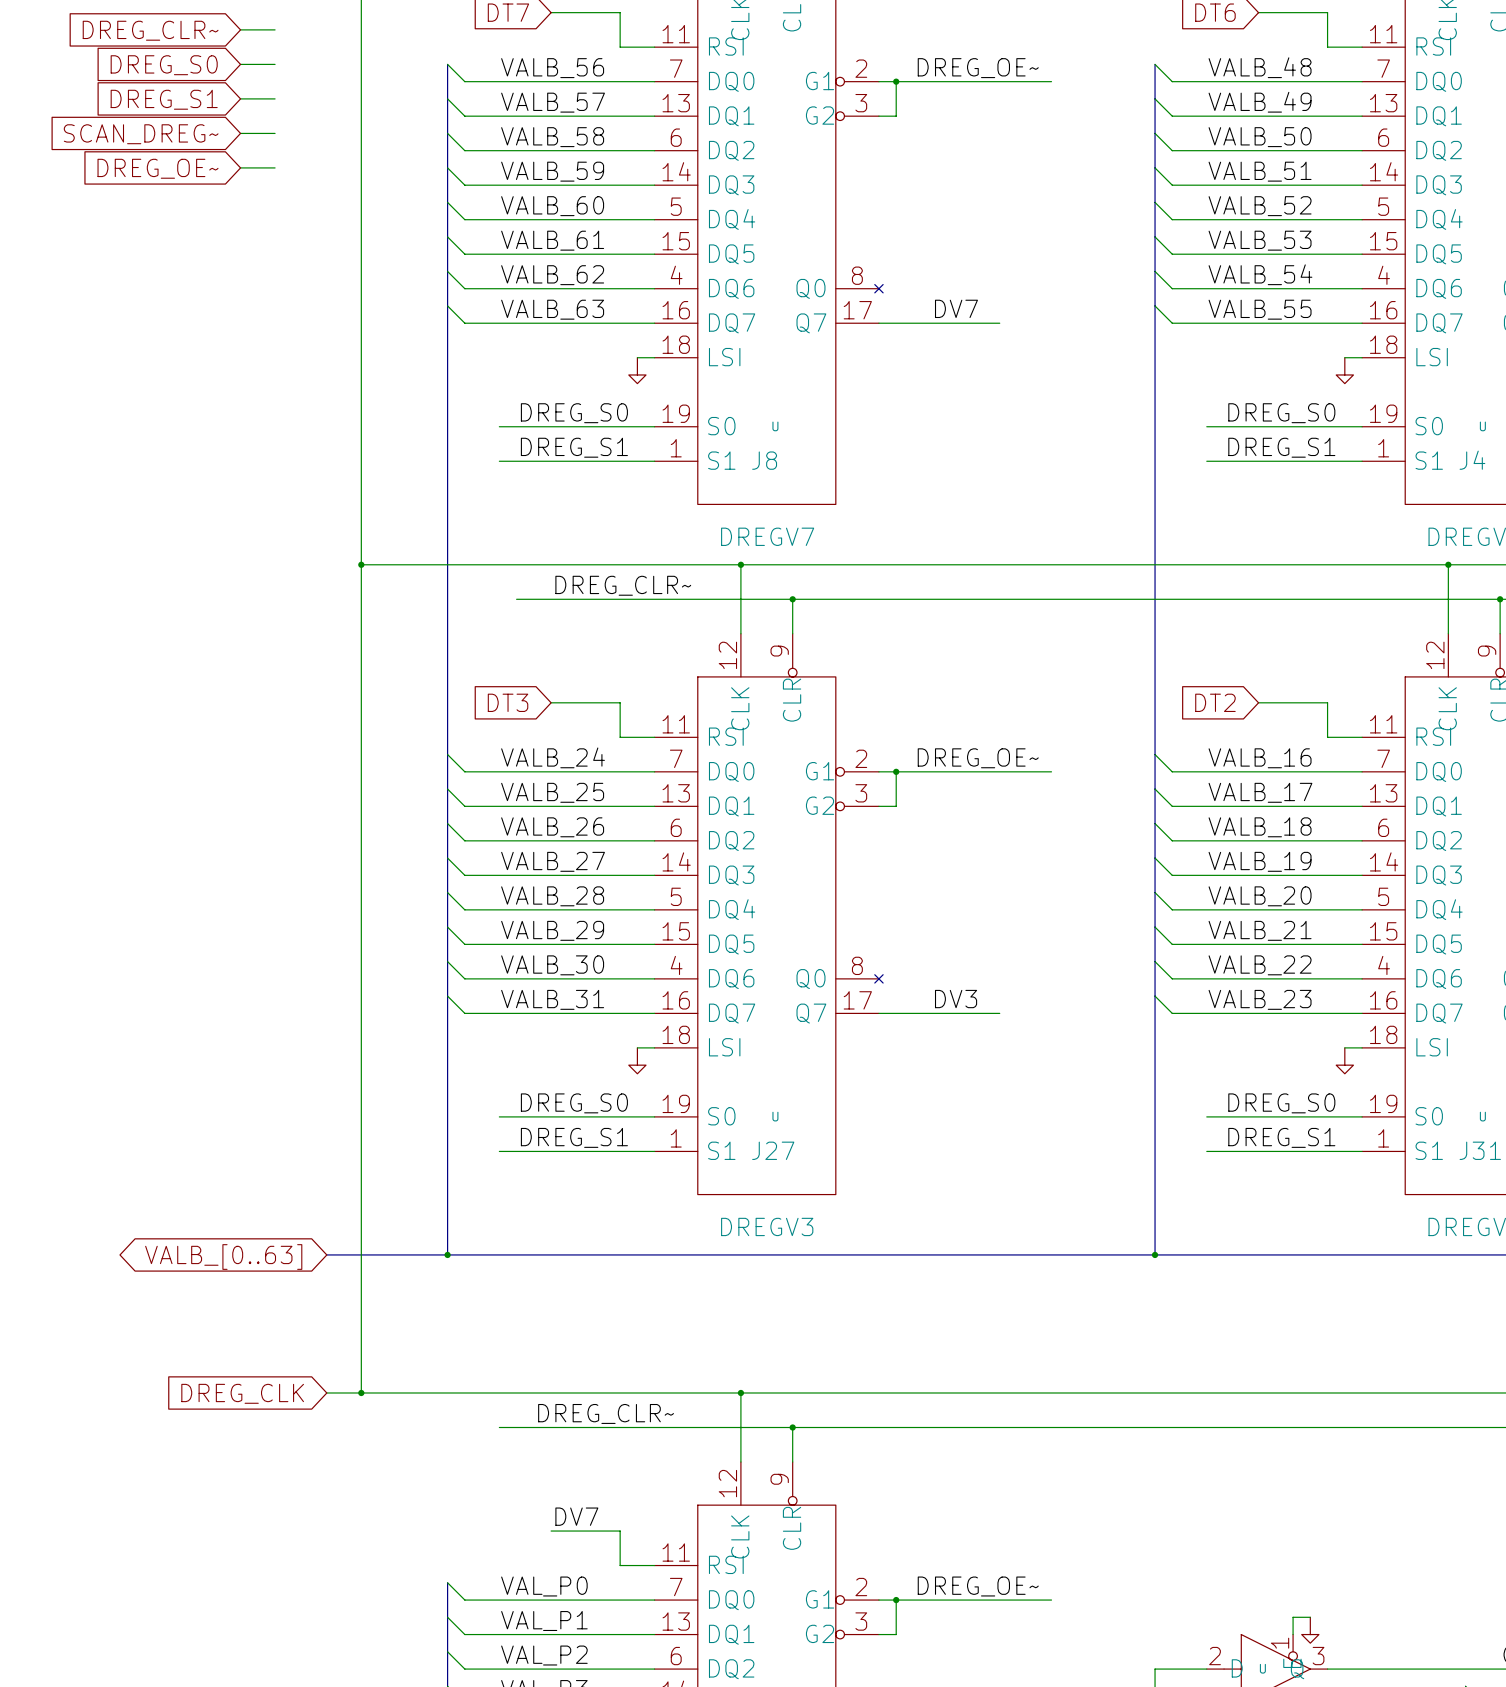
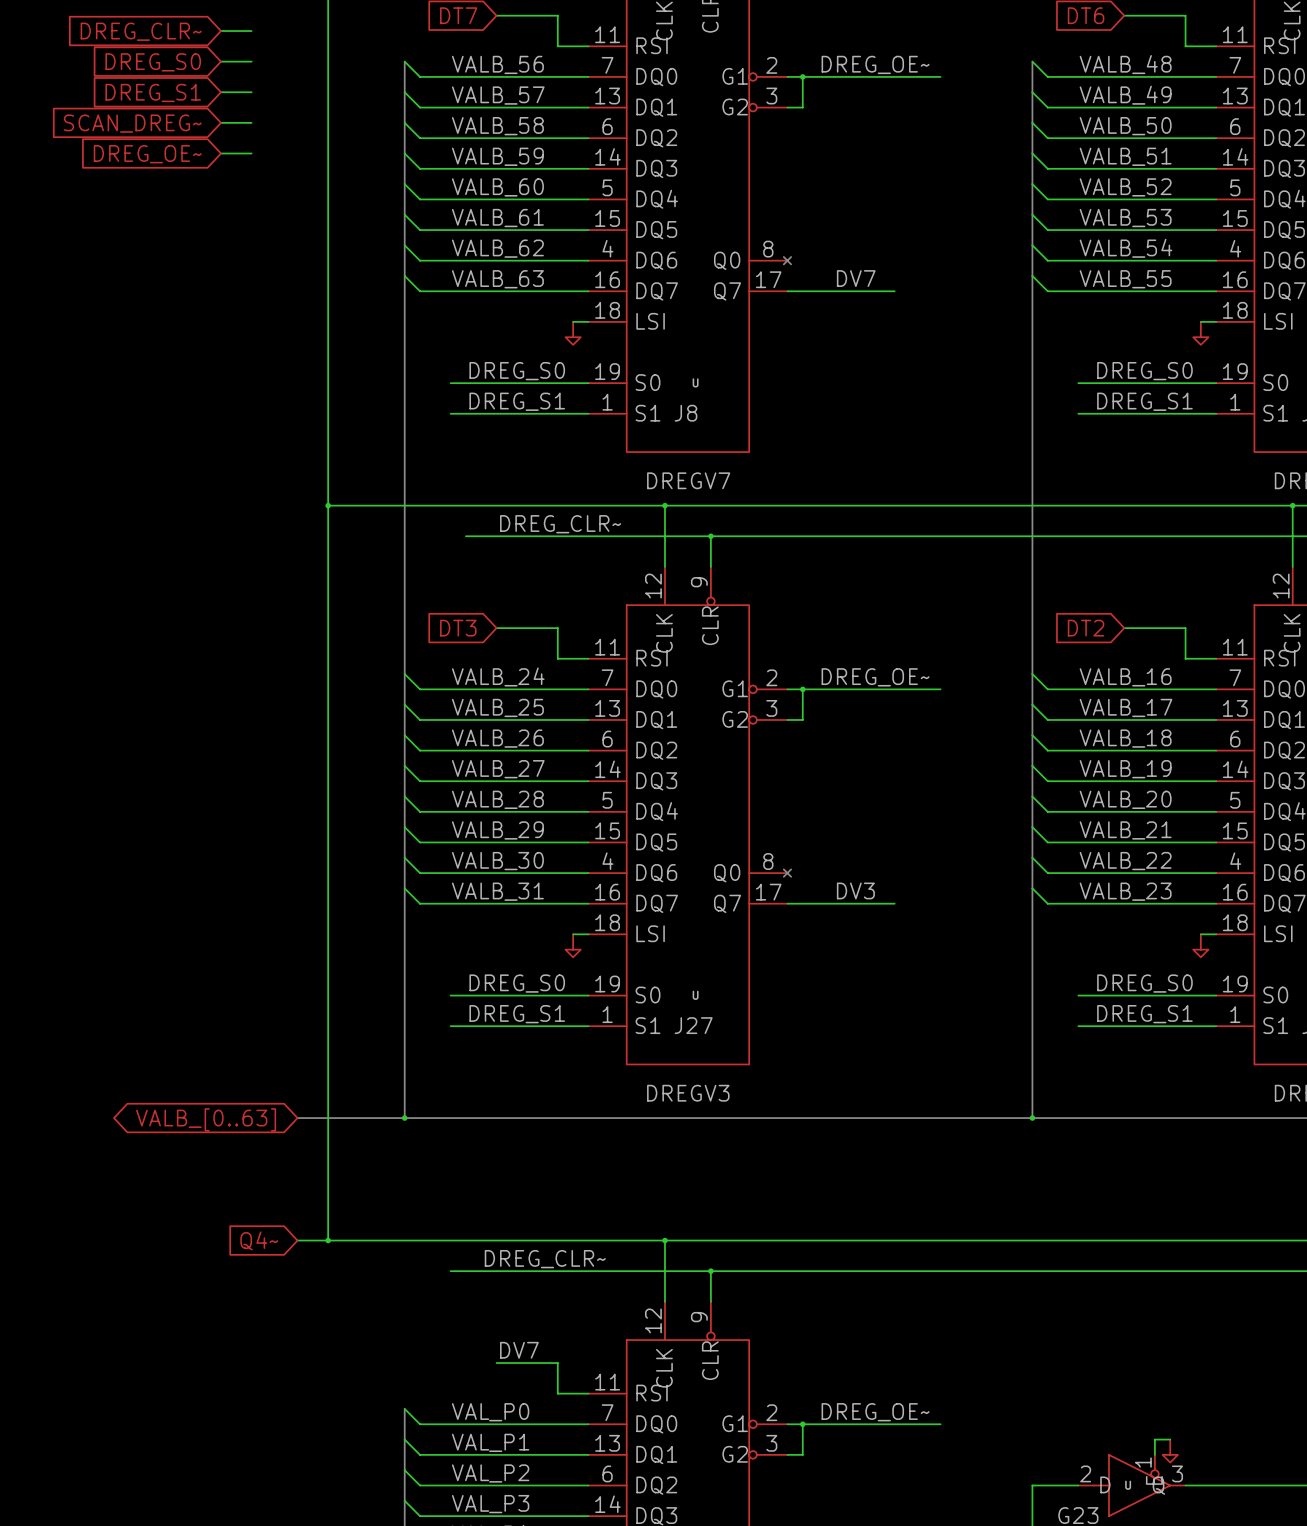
global label: DREG_CLK (242, 1393) -> Q4~ (259, 1240)

